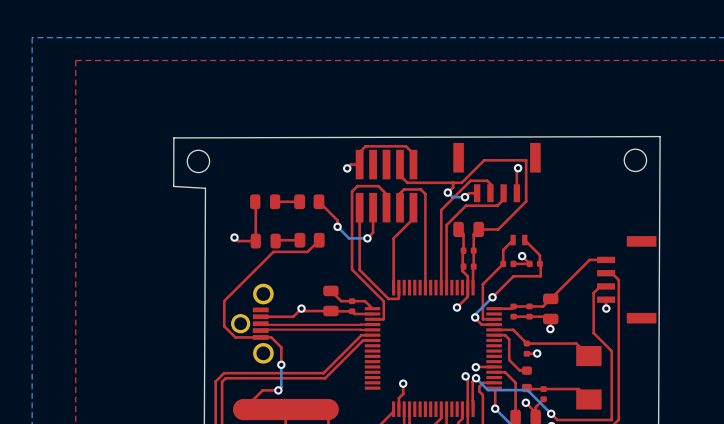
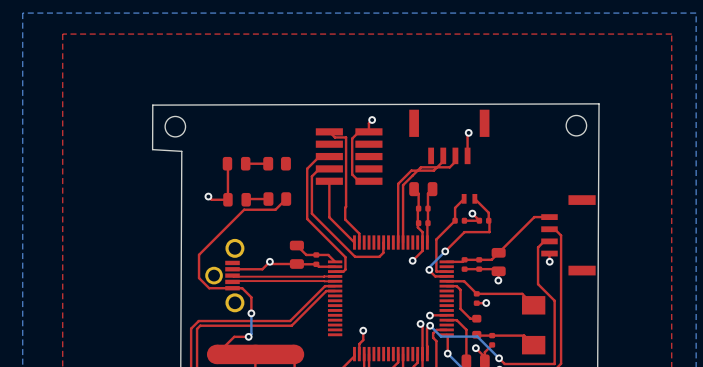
top track: none -> (372, 120) (368, 123) (368, 131) (358, 131) (352, 138) (352, 174) (358, 181) (368, 181)
via: none -> (372, 120)
top track: (399, 164) (399, 175) (407, 182) (461, 182) (484, 160) (526, 160) (526, 201) (498, 229) (478, 229) -> none
top track: (413, 164) (413, 153) (406, 146) (365, 146) (359, 152) (359, 164) (351, 164) (347, 168) -> none
via: (347, 168) -> none
top track: (453, 182) (453, 187) (447, 192) -> none
part rotation: 0° (386, 186) -> 90° clockwise (349, 156)
bottom track: (447, 192) (452, 197) (465, 197) -> none
via: (447, 192) -> none
top track: (477, 193) (468, 193) (465, 197) -> none
top track: (490, 193) (490, 184) (487, 180) (470, 180) (441, 210) (441, 223) -> (443, 154) (443, 161) (433, 170) (411, 170) (398, 183)
via: (465, 197) -> none
top track: (318, 201) (337, 220) (337, 226) -> none
top track: (359, 207) (359, 269) (388, 298) (398, 298) (398, 287) -> (329, 131) (334, 137) (346, 137) (345, 219) (359, 233) (359, 242)
top track: (373, 207) (373, 232) (367, 238) -> none
top track: (386, 207) (386, 194) (378, 186) (357, 186) (352, 191) (352, 269) (383, 301) (383, 319) (381, 319) -> (329, 156) (319, 156) (307, 168) (307, 218) (345, 257) (345, 269) (343, 271)
top track: (399, 207) (399, 193) (403, 189) (420, 189) (425, 194) (425, 287) -> (329, 168) (319, 168) (311, 176) (311, 213) (355, 256) (379, 256) (383, 252) (383, 242)
top track: (413, 207) (413, 218) (393, 238) (393, 287) -> (329, 181) (329, 217) (354, 242)
bottom track: (337, 226) (349, 238) (367, 238) -> none
via: (337, 226) -> none
via: (367, 238) -> none

